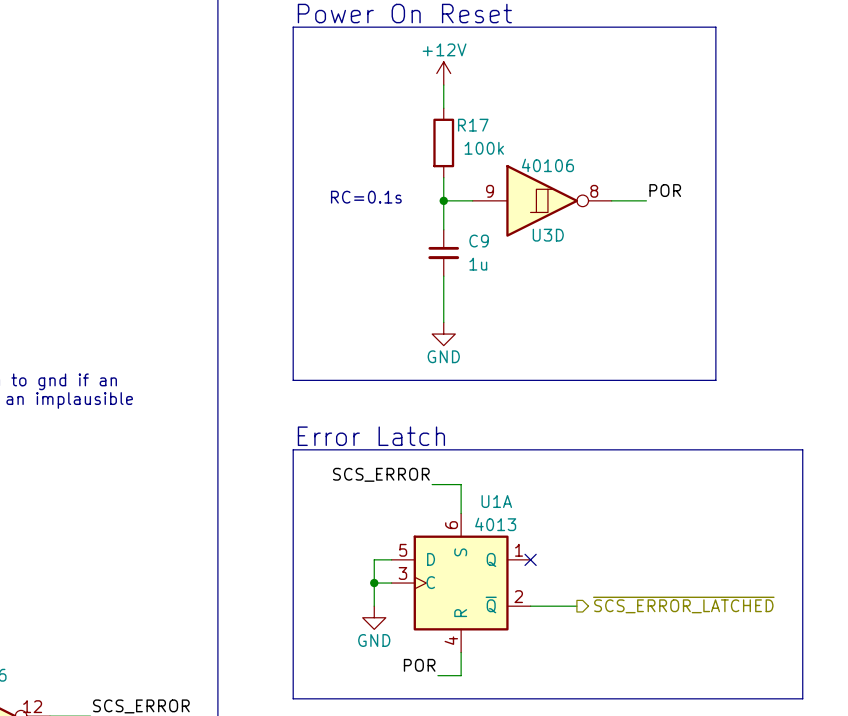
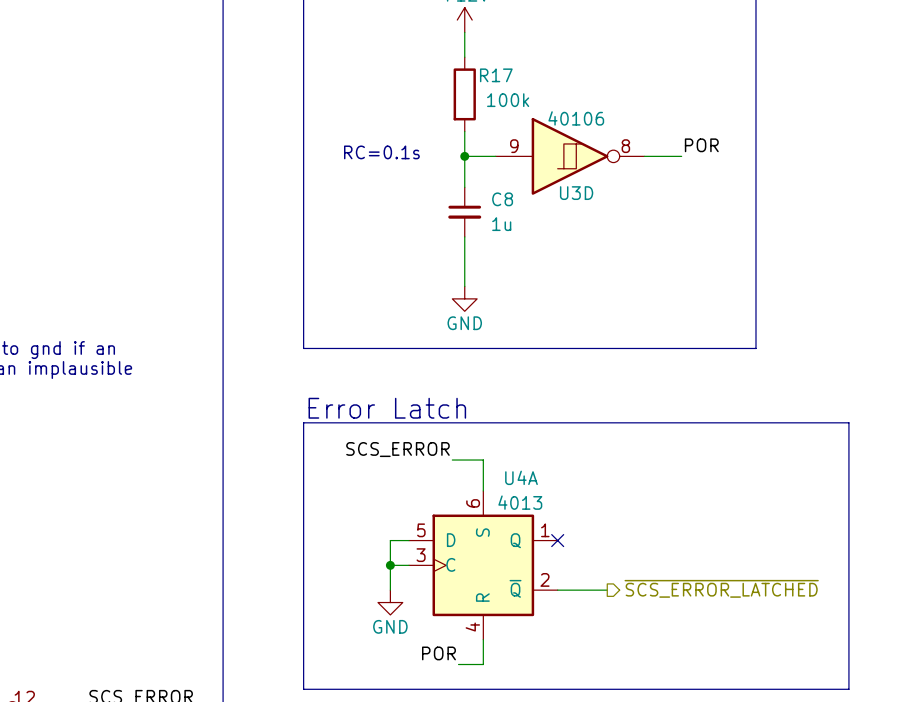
C9 name: C9 (479, 241) -> C8 (502, 199)
U1A name: U1A (496, 501) -> U4A (521, 477)

